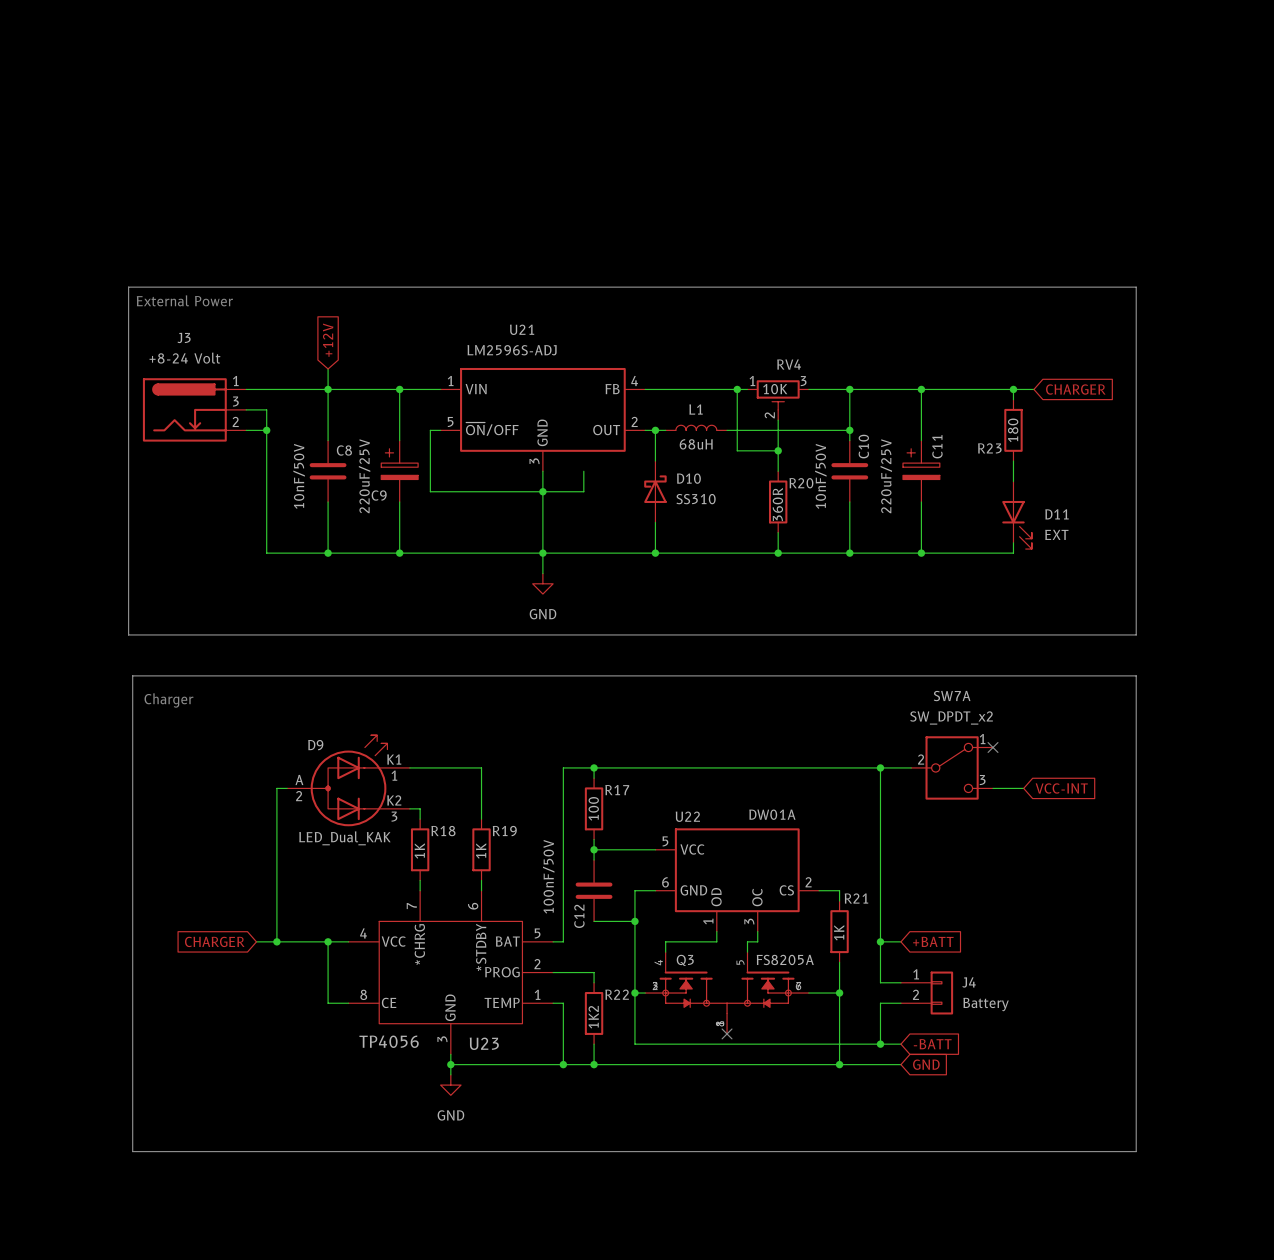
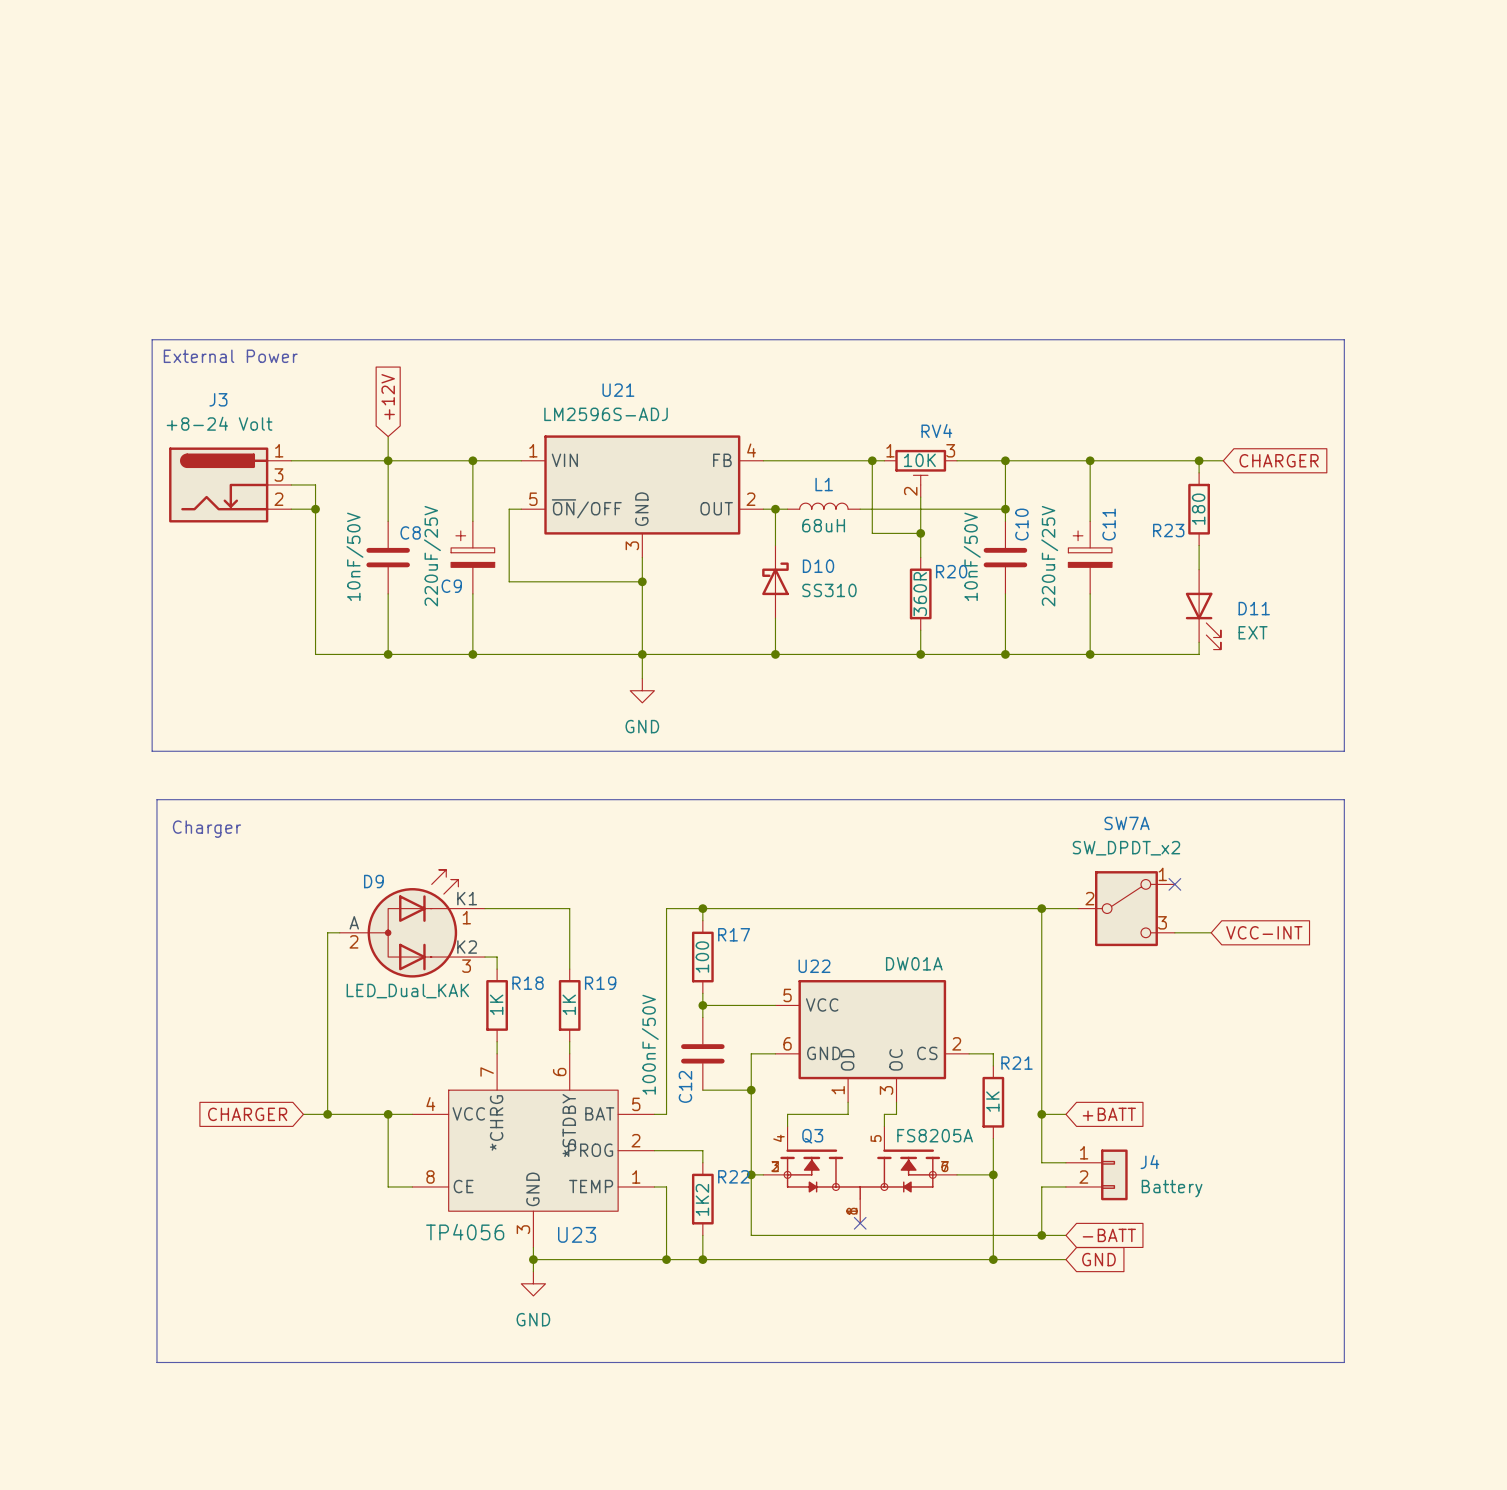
wire: (583, 471) (583, 491) (542, 491) -> none

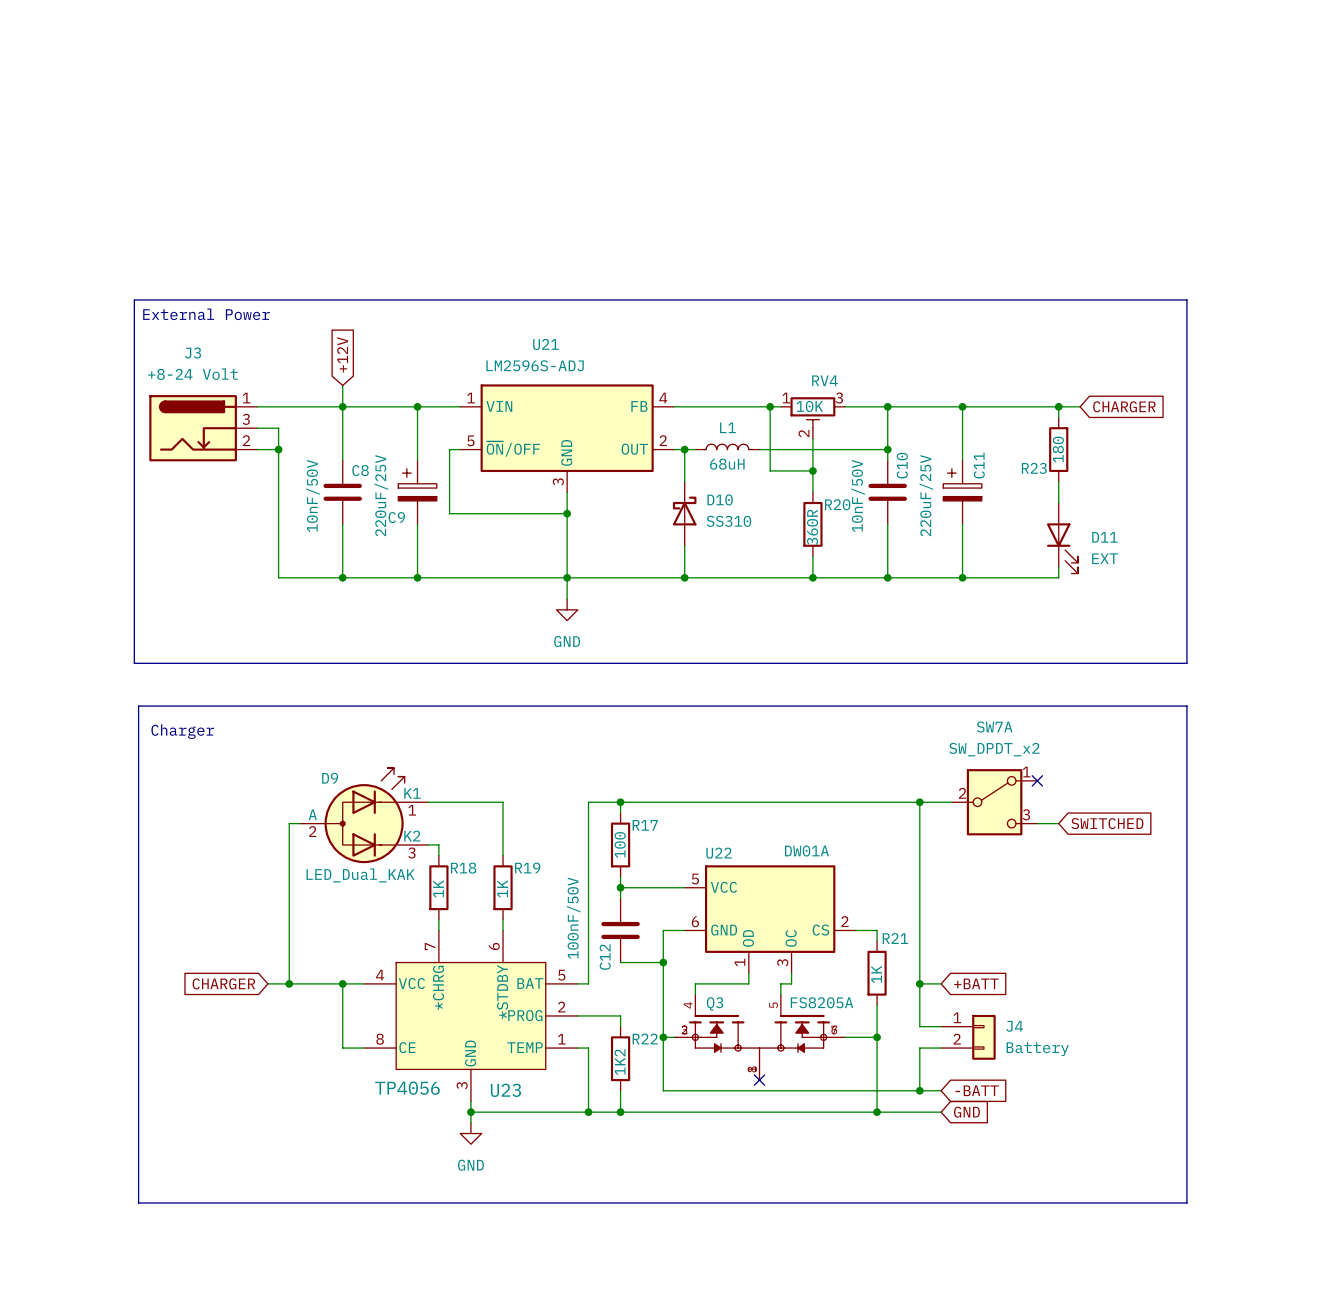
wire: (1199, 932) (1211, 932) -> none
global label: none -> SWITCHED (1107, 823)
global label: VCC-INT (1264, 932) -> none

